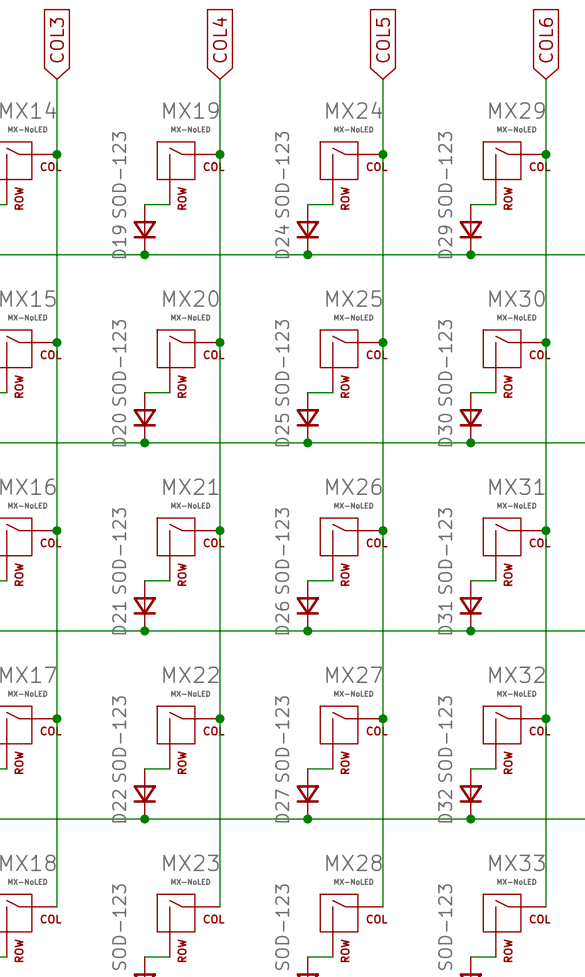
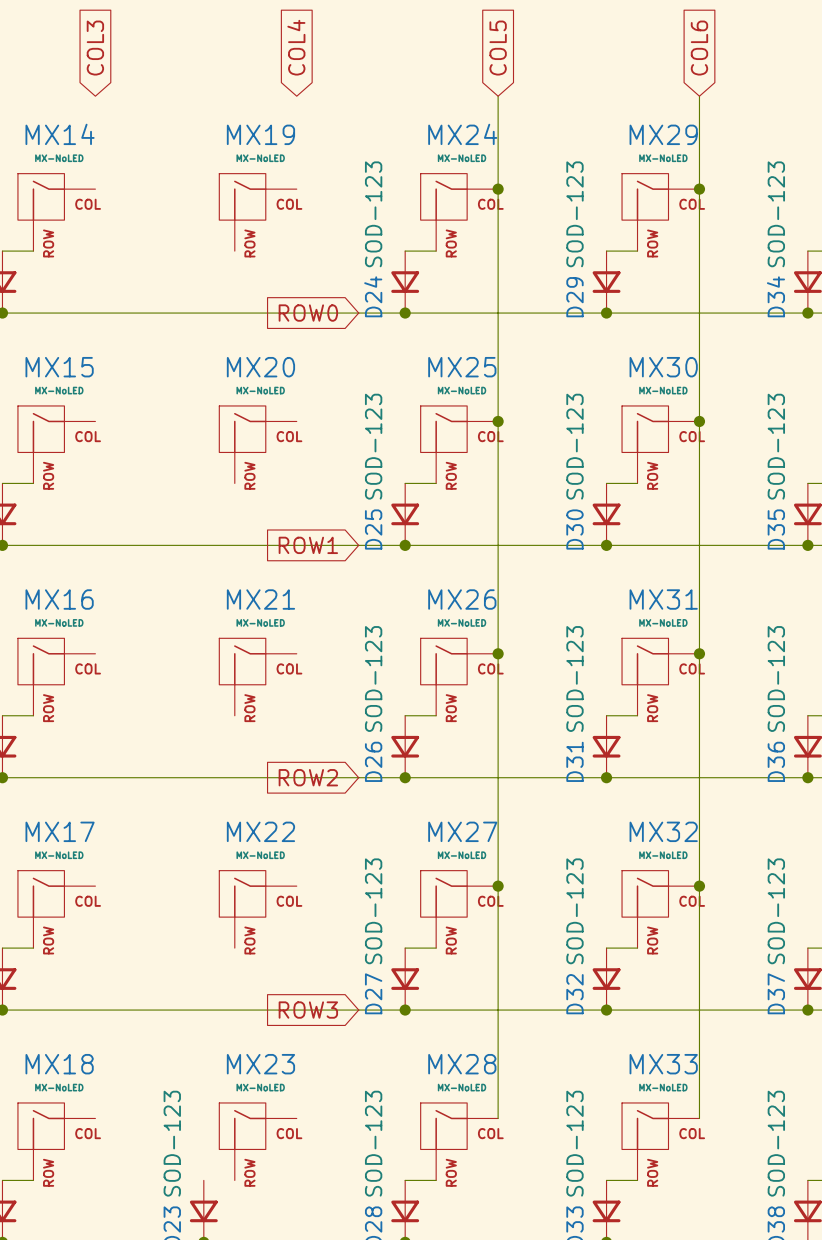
wire: (56, 79) (56, 906) -> none
wire: (219, 79) (219, 906) -> none
junction: (56, 154) -> none
junction: (219, 154) -> none
wire: (144, 204) (169, 204) -> none
D19: SOD-123 (144, 229) -> none
junction: (144, 254) -> none
global label: none -> ROW0 (308, 313)
junction: (56, 342) -> none
junction: (219, 342) -> none
wire: (144, 392) (169, 392) -> none
D20: SOD-123 (144, 417) -> none
junction: (144, 442) -> none
global label: none -> ROW1 (308, 545)
junction: (56, 530) -> none
junction: (219, 530) -> none
wire: (144, 580) (169, 580) -> none
D21: SOD-123 (144, 605) -> none
junction: (144, 630) -> none
global label: none -> ROW2 (308, 777)
junction: (56, 718) -> none
junction: (219, 718) -> none
wire: (144, 768) (169, 768) -> none
D22: SOD-123 (144, 793) -> none
junction: (144, 819) -> none
global label: none -> ROW3 (308, 1010)
wire: (144, 956) (169, 956) -> none

